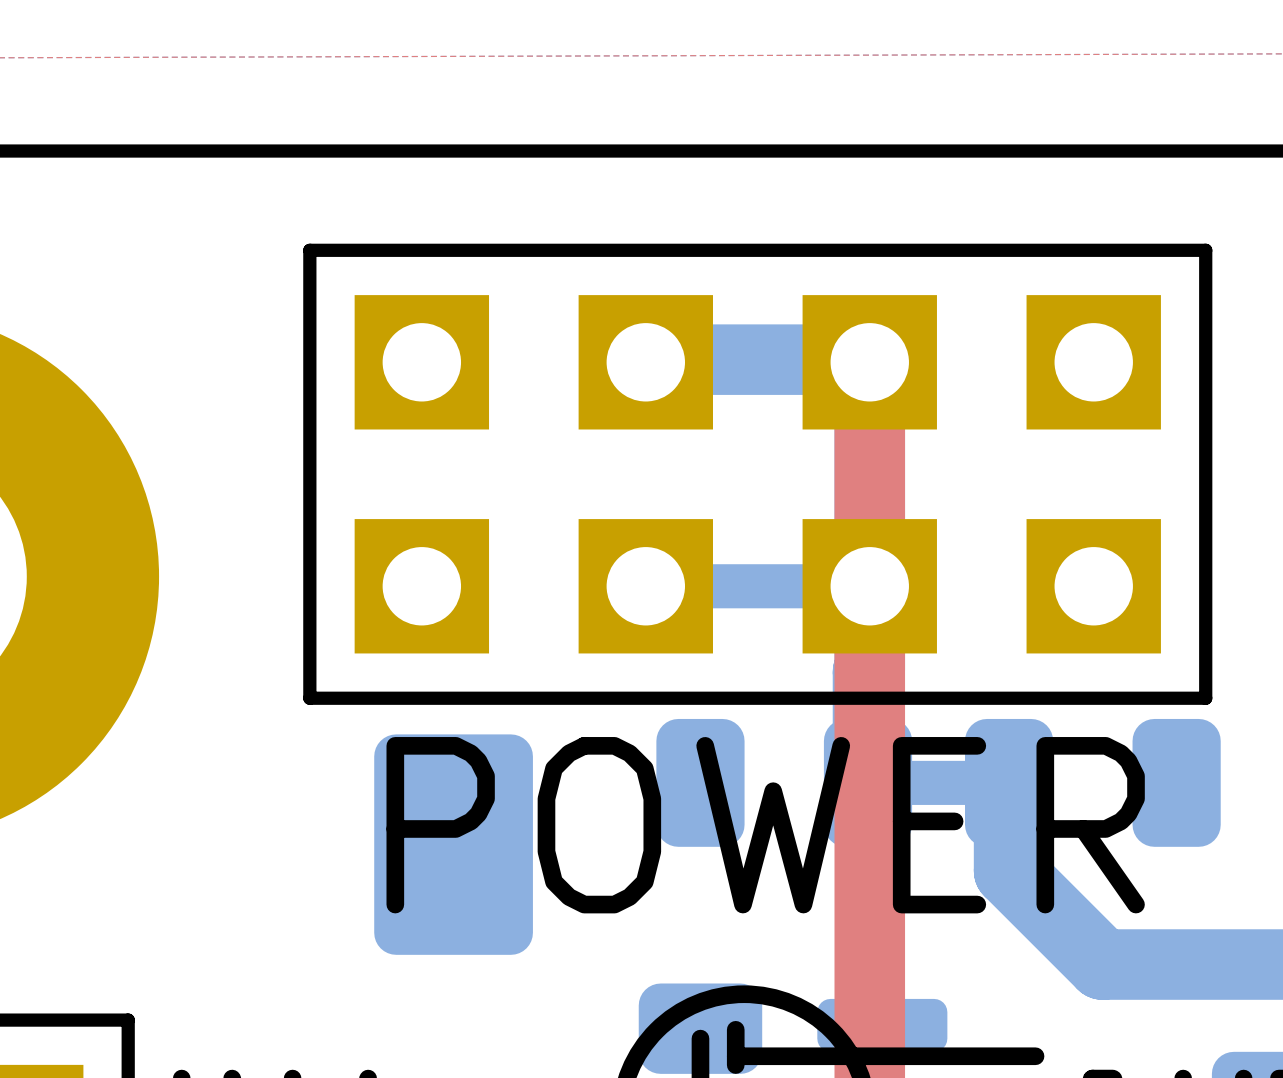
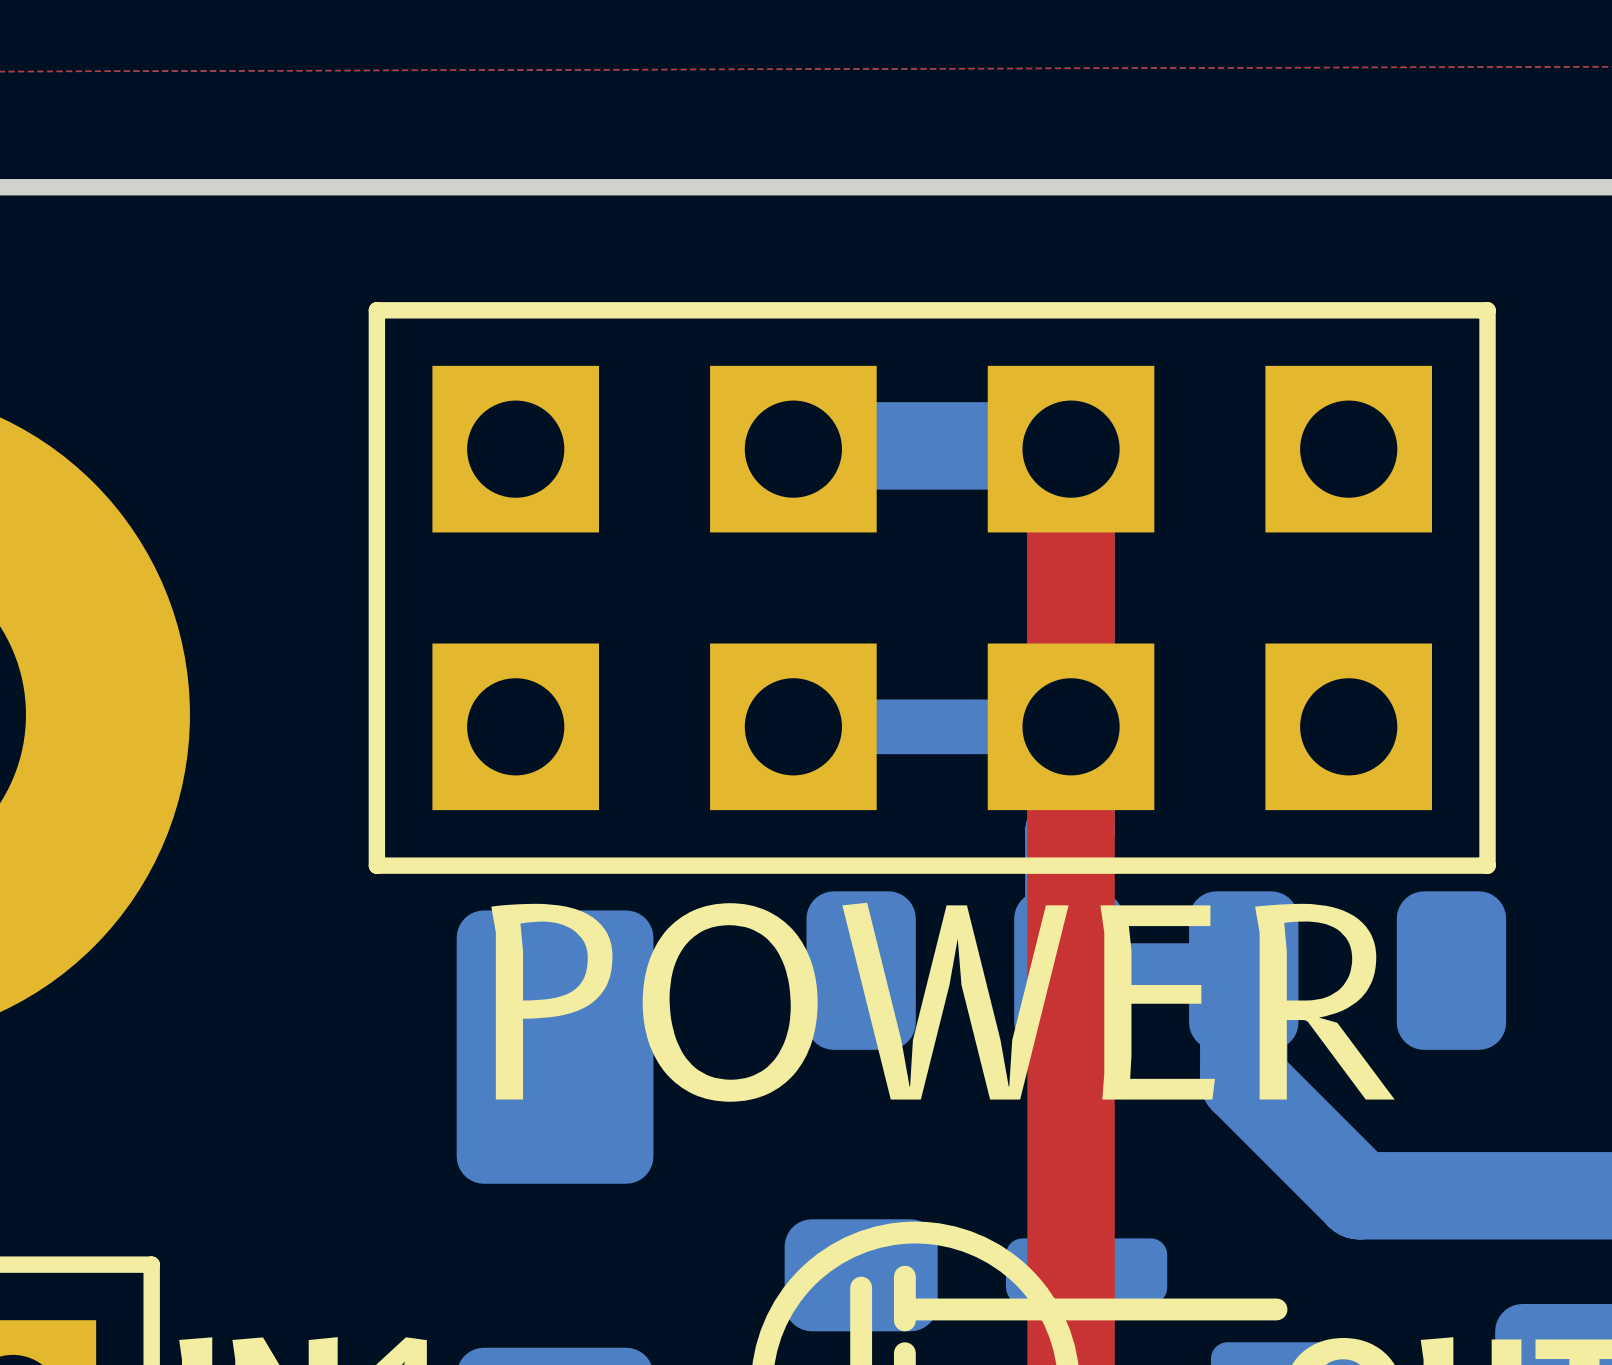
text position: POWER (765, 825) -> POWER (942, 1002)

